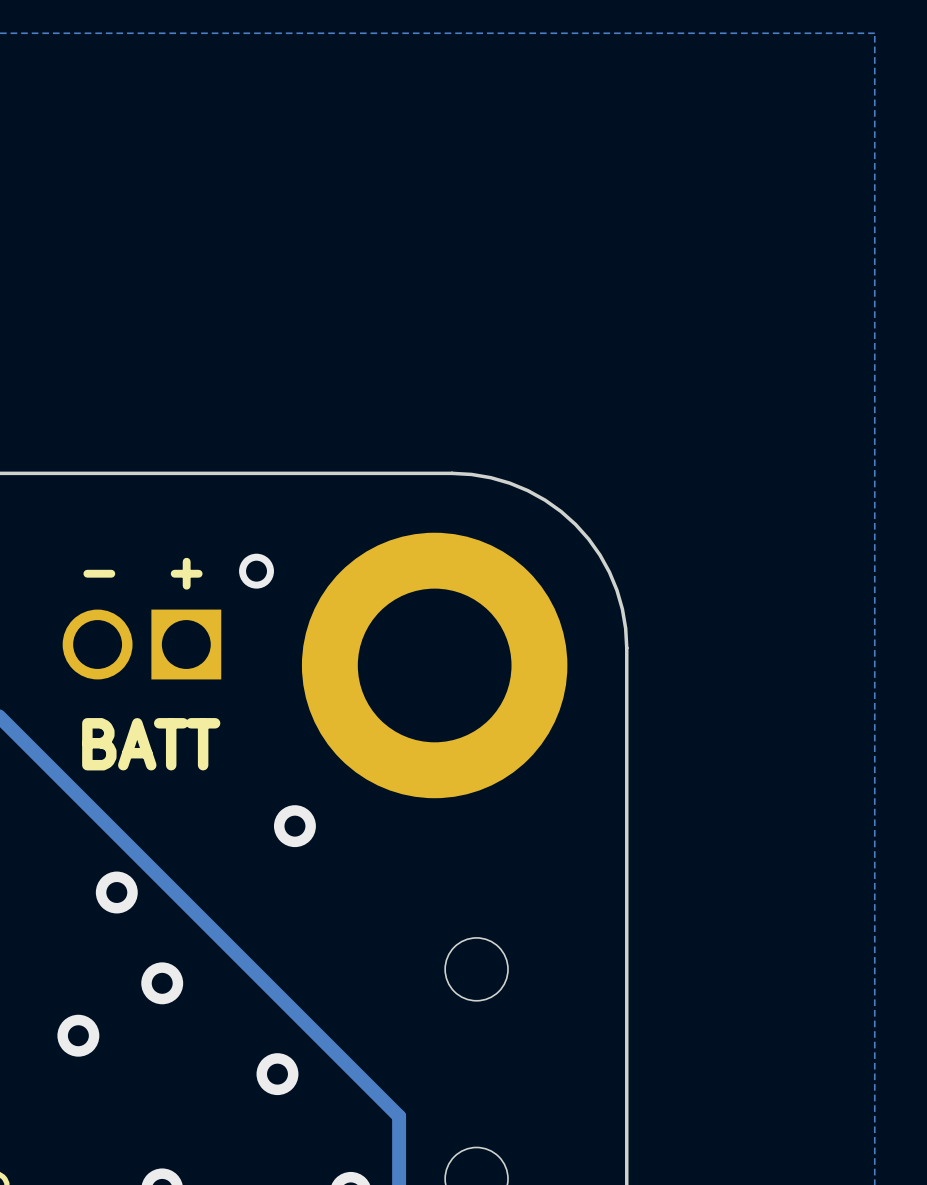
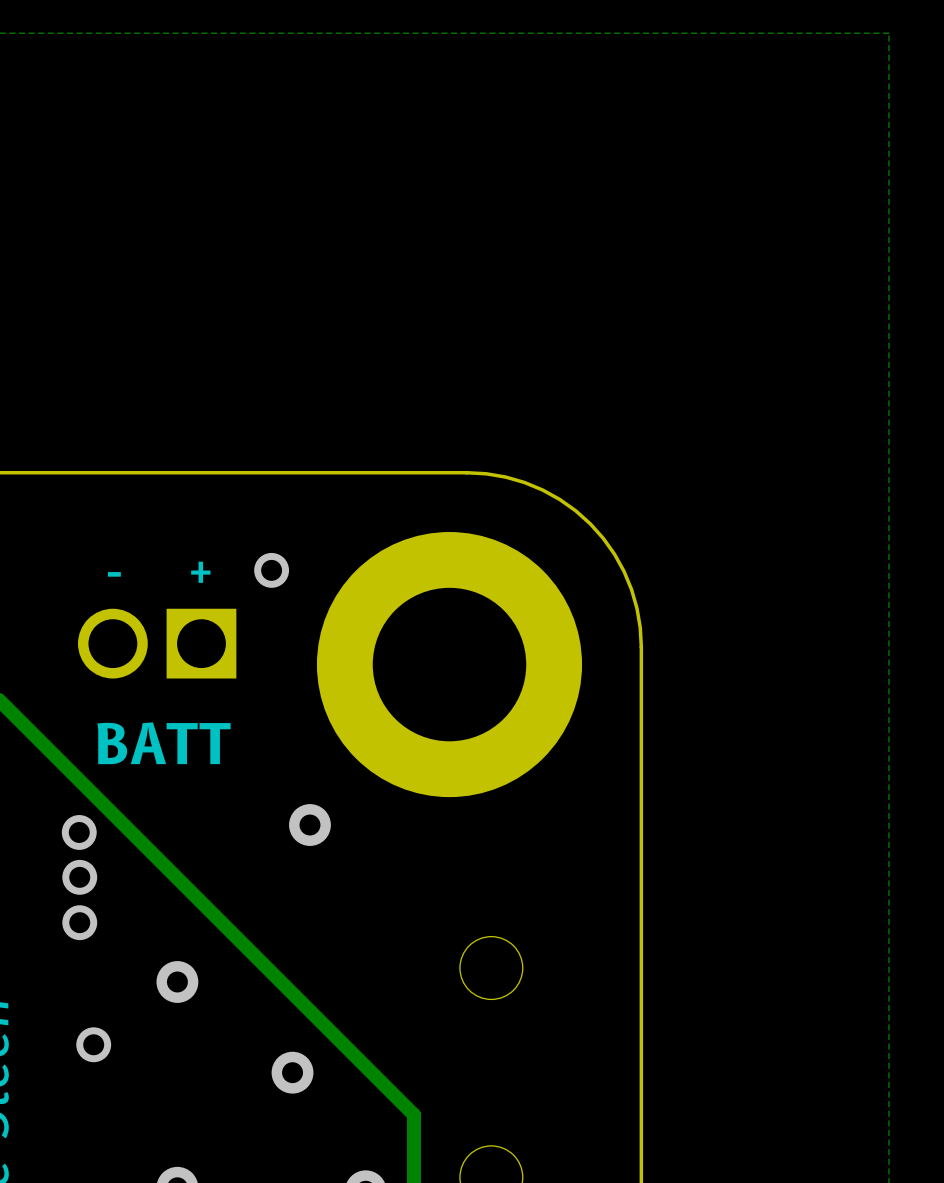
via: none -> (79, 832)
via: none -> (79, 877)
via: (116, 892) -> none
via: none -> (79, 922)
via size: [57, 1014, 100, 1057] -> [76, 1027, 112, 1063]

